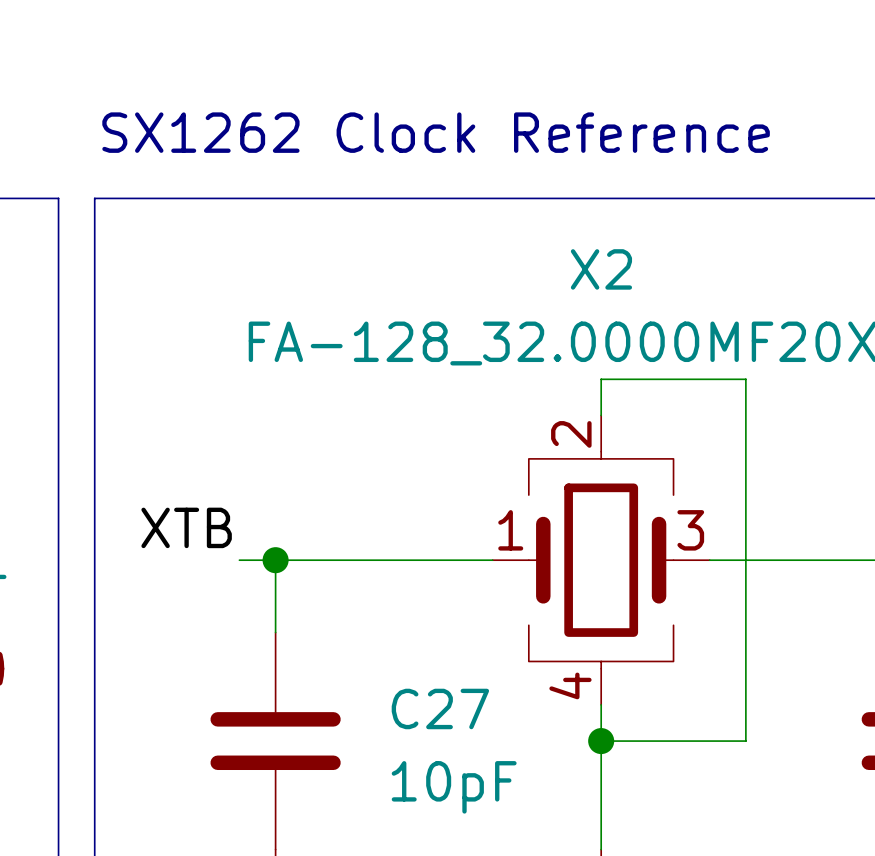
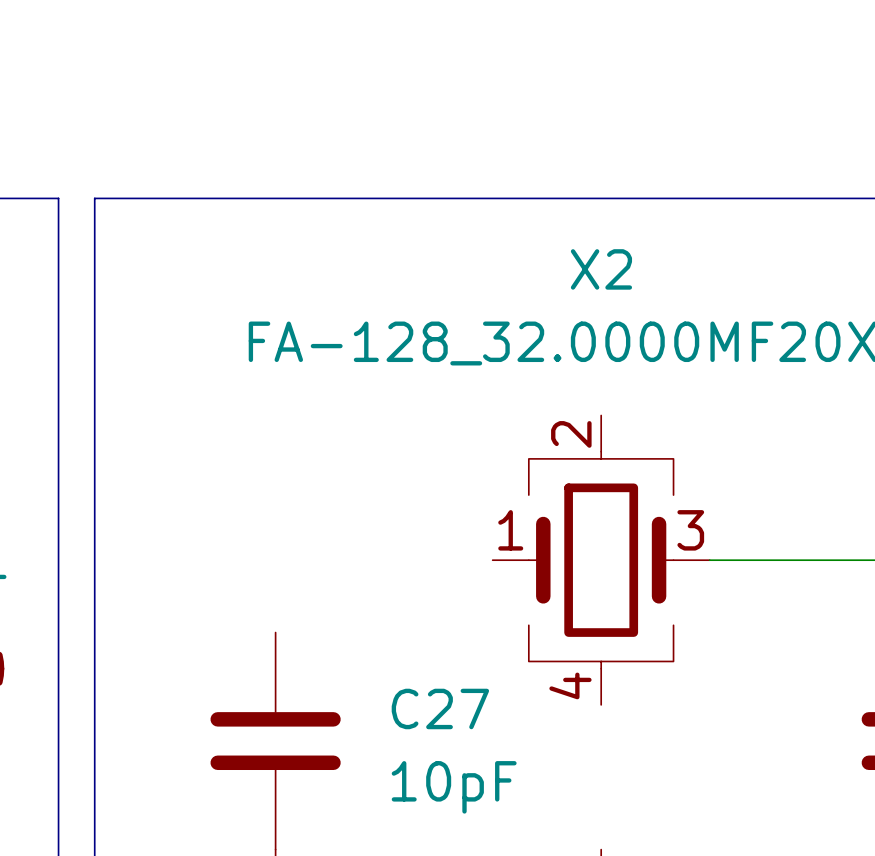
text: SX1262 Clock Reference (436, 132) -> none
wire: (601, 415) (601, 379) (745, 379) (745, 741) (601, 741) -> none
label: XTB (186, 527) -> none
wire: (239, 560) (492, 560) -> none
wire: (275, 560) (275, 632) -> none
junction: (275, 560) -> none
wire: (601, 704) (601, 849) -> none
junction: (601, 741) -> none

